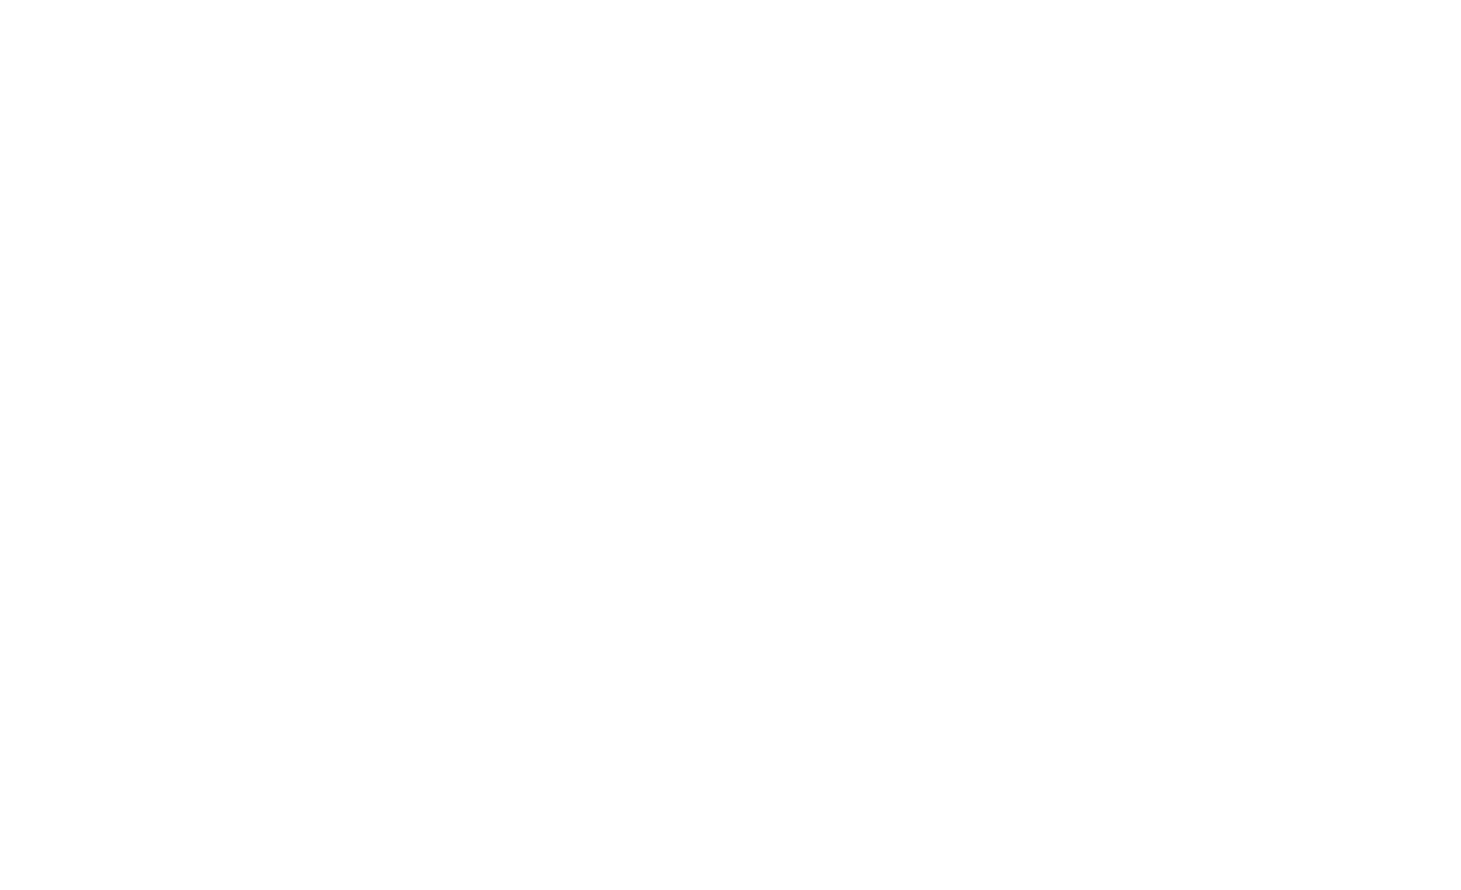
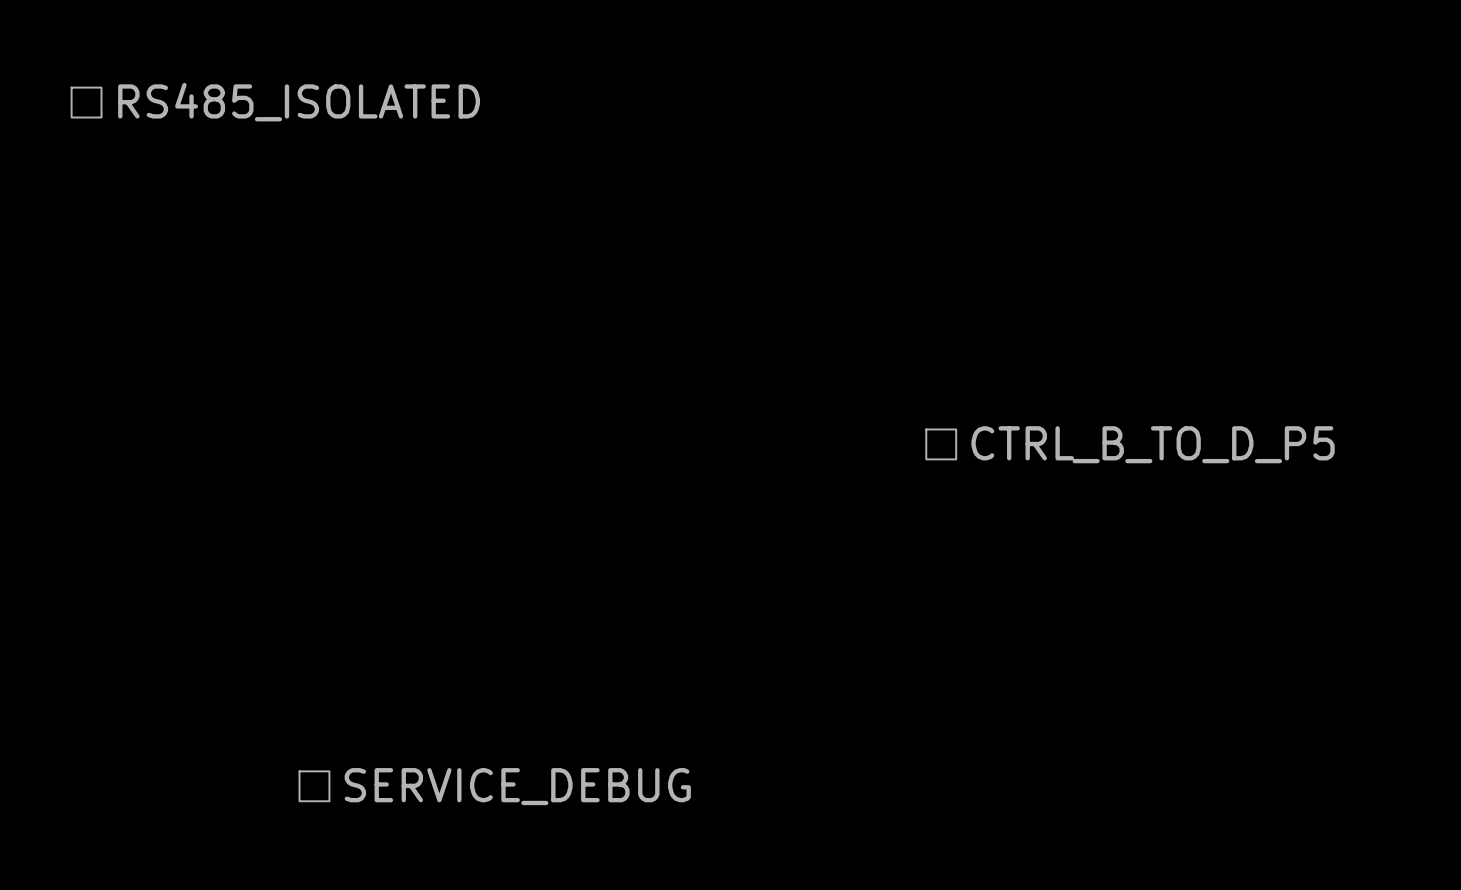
hierarchical label: none -> RS485_ISOLATED (299, 102)
hierarchical label: none -> CTRL_B_TO_D_P5 (1153, 444)
hierarchical label: none -> SERVICE_DEBUG (517, 786)

